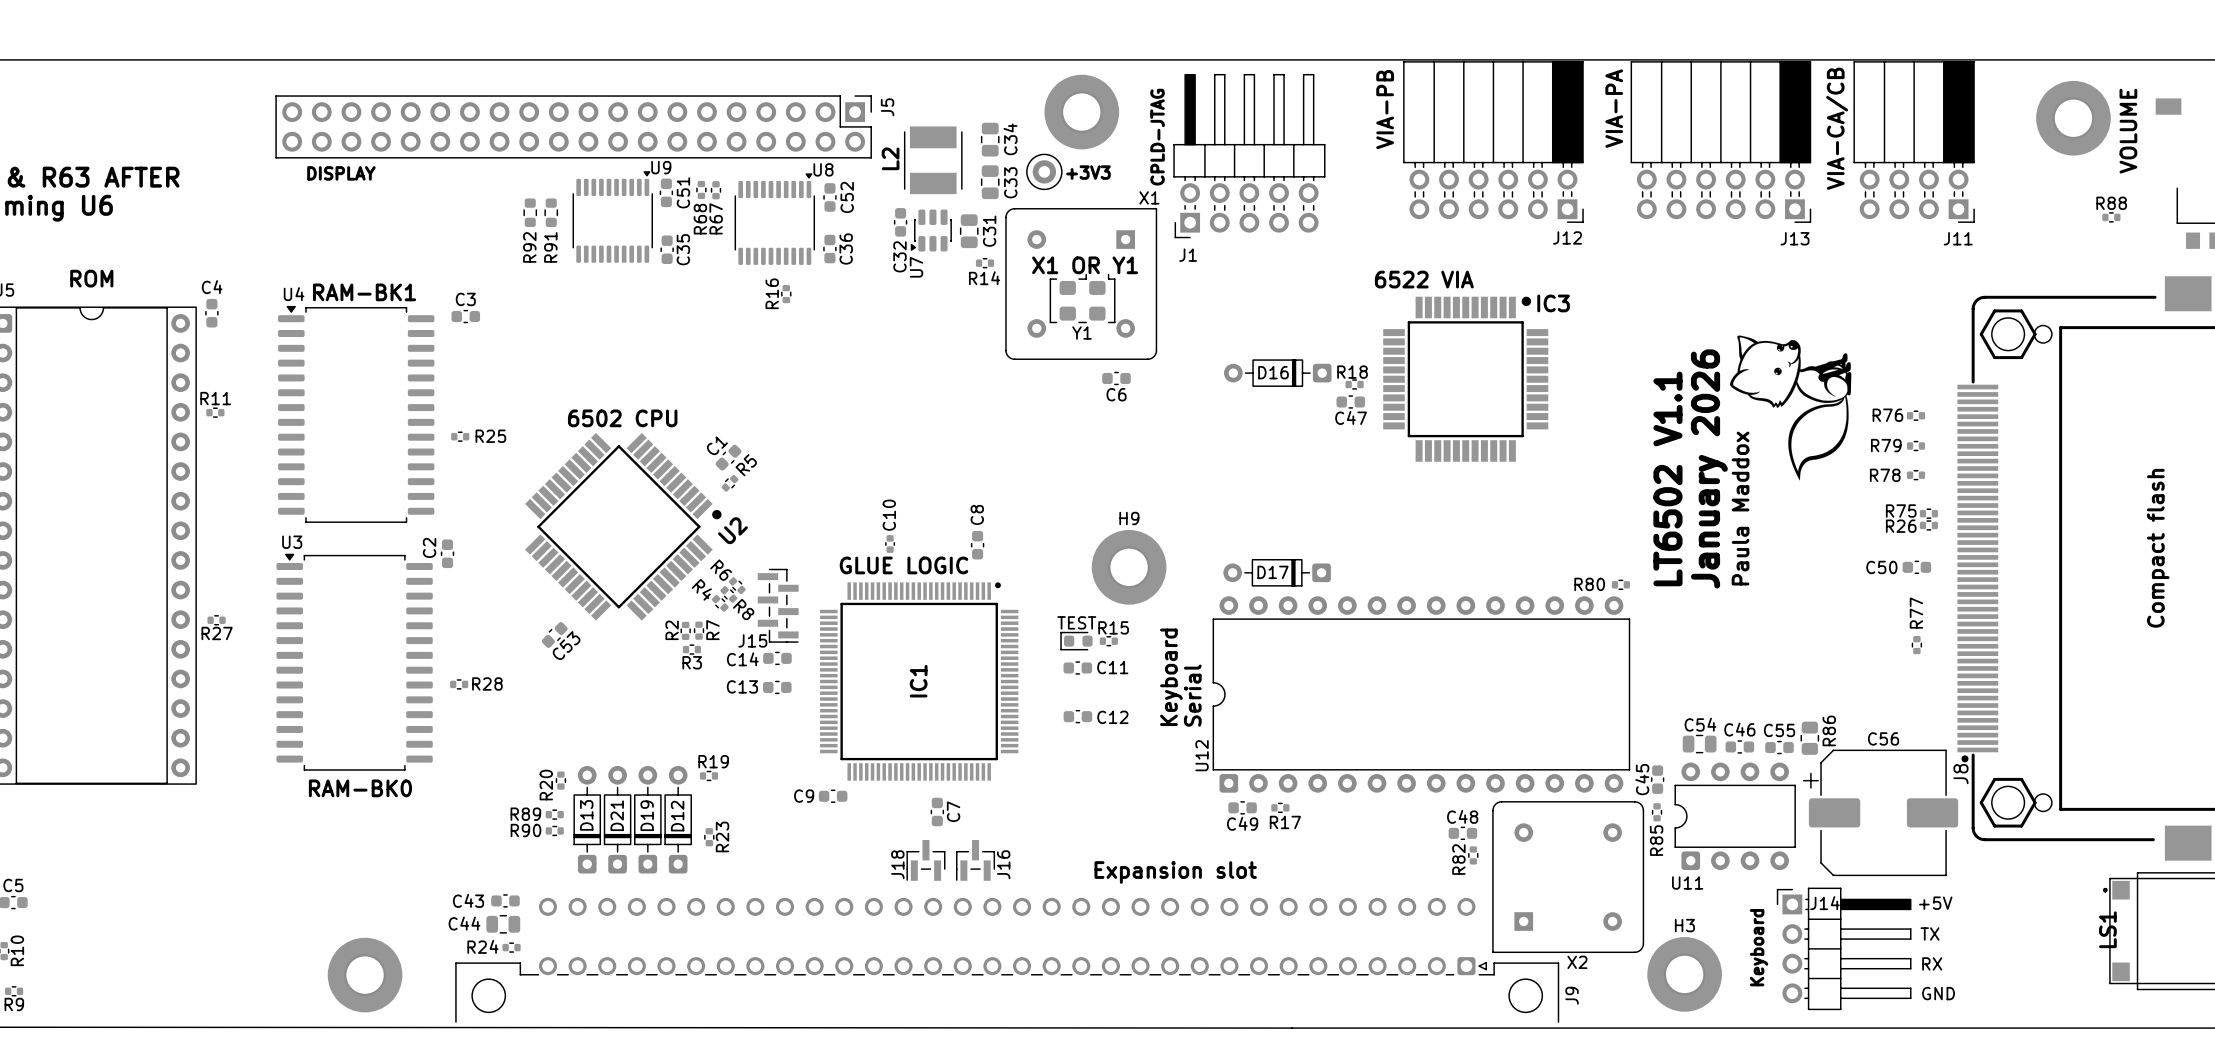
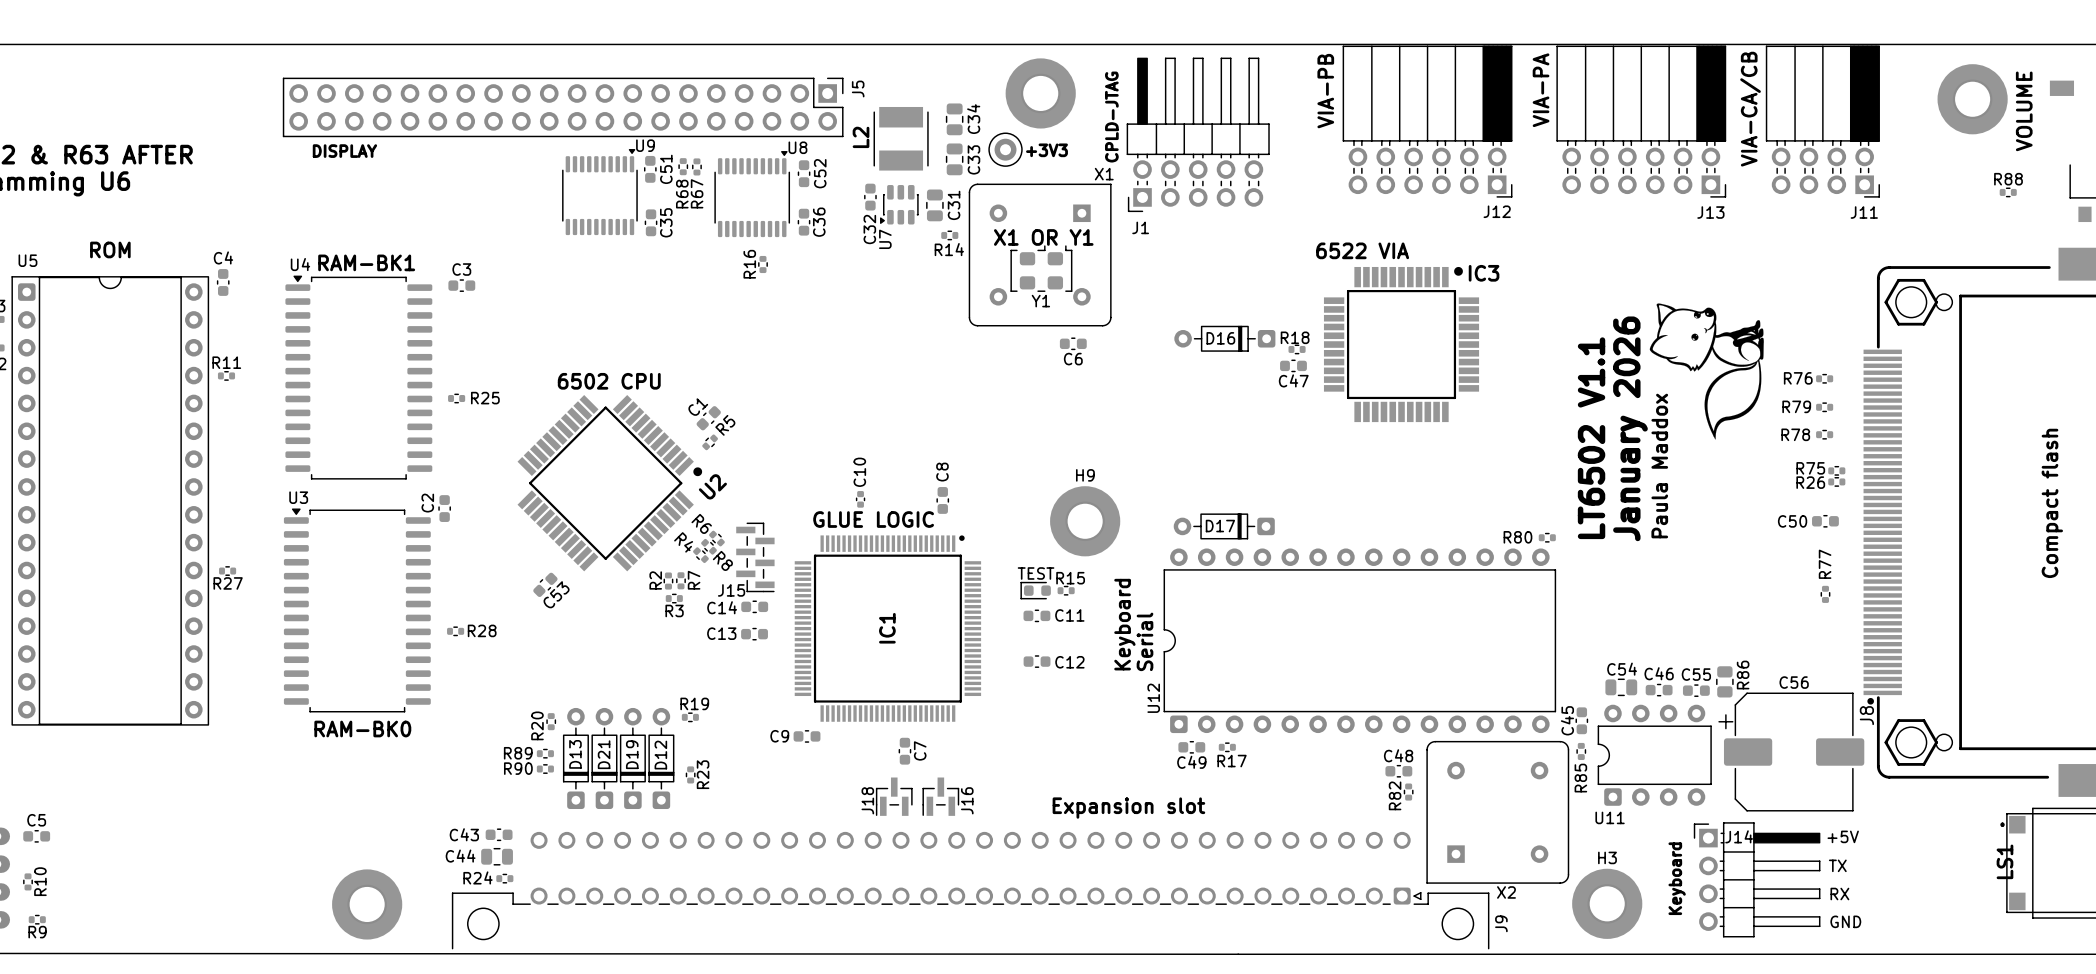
R92: (530, 212) -> none
R91: (551, 212) -> none

